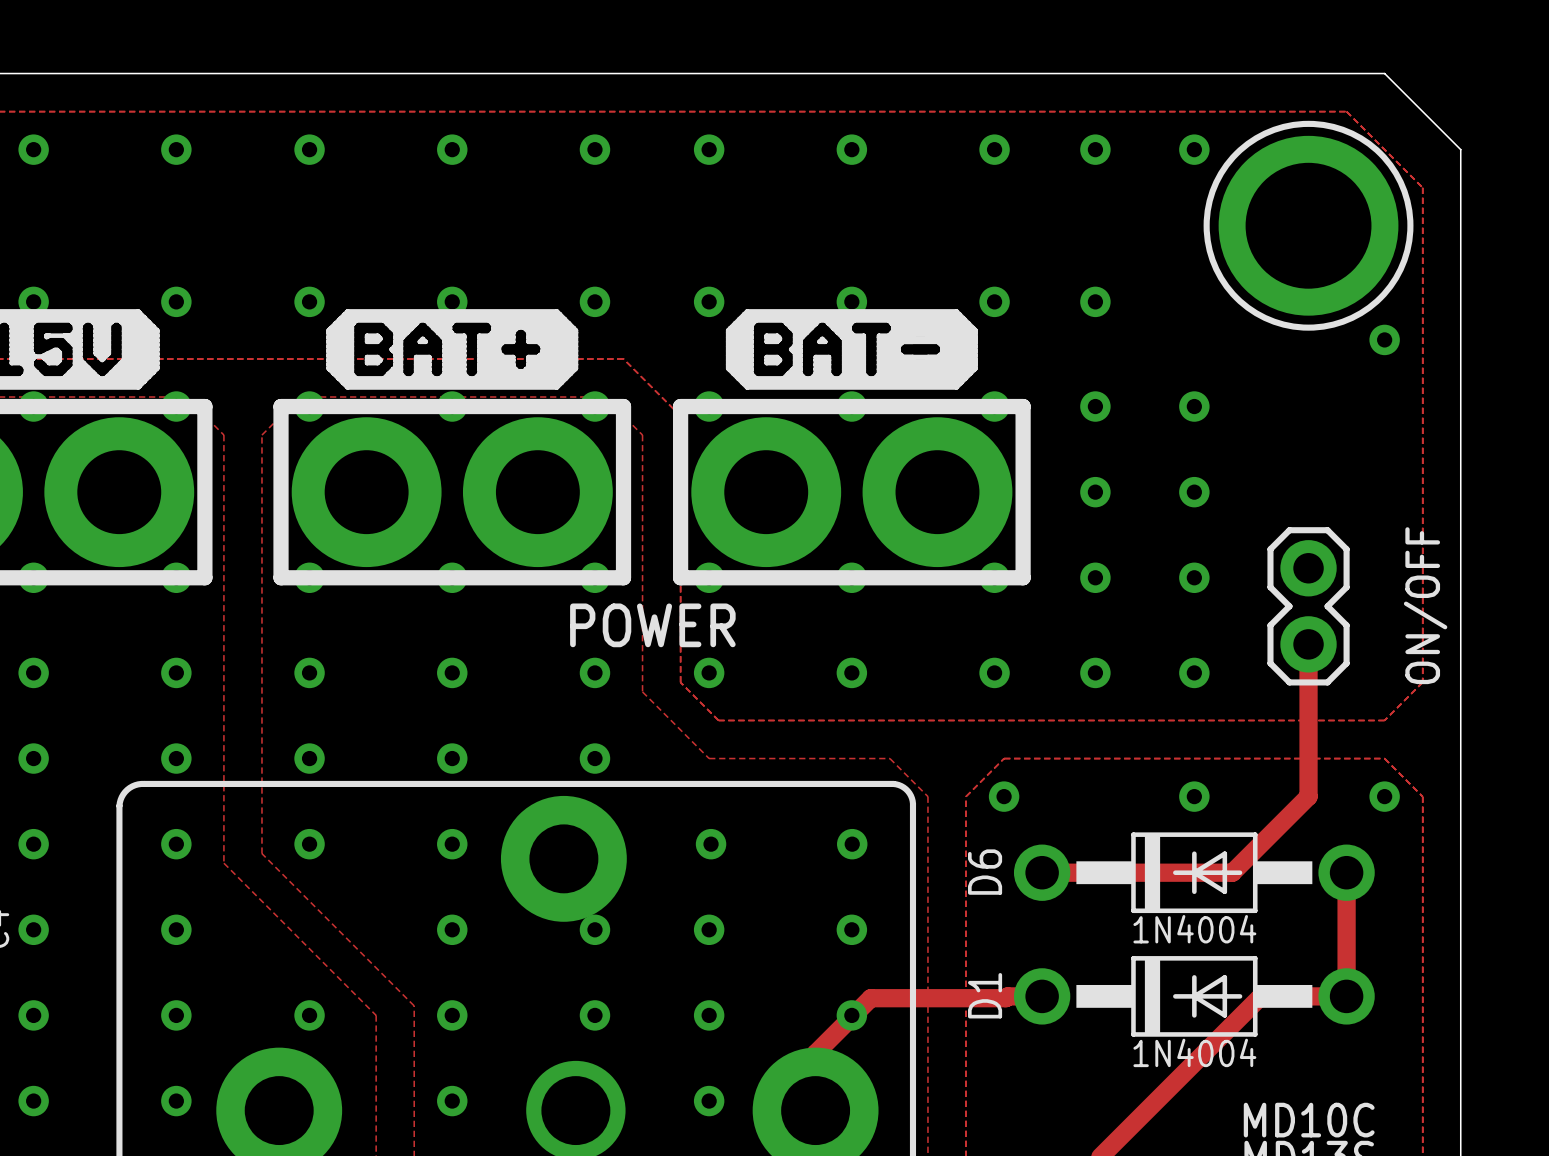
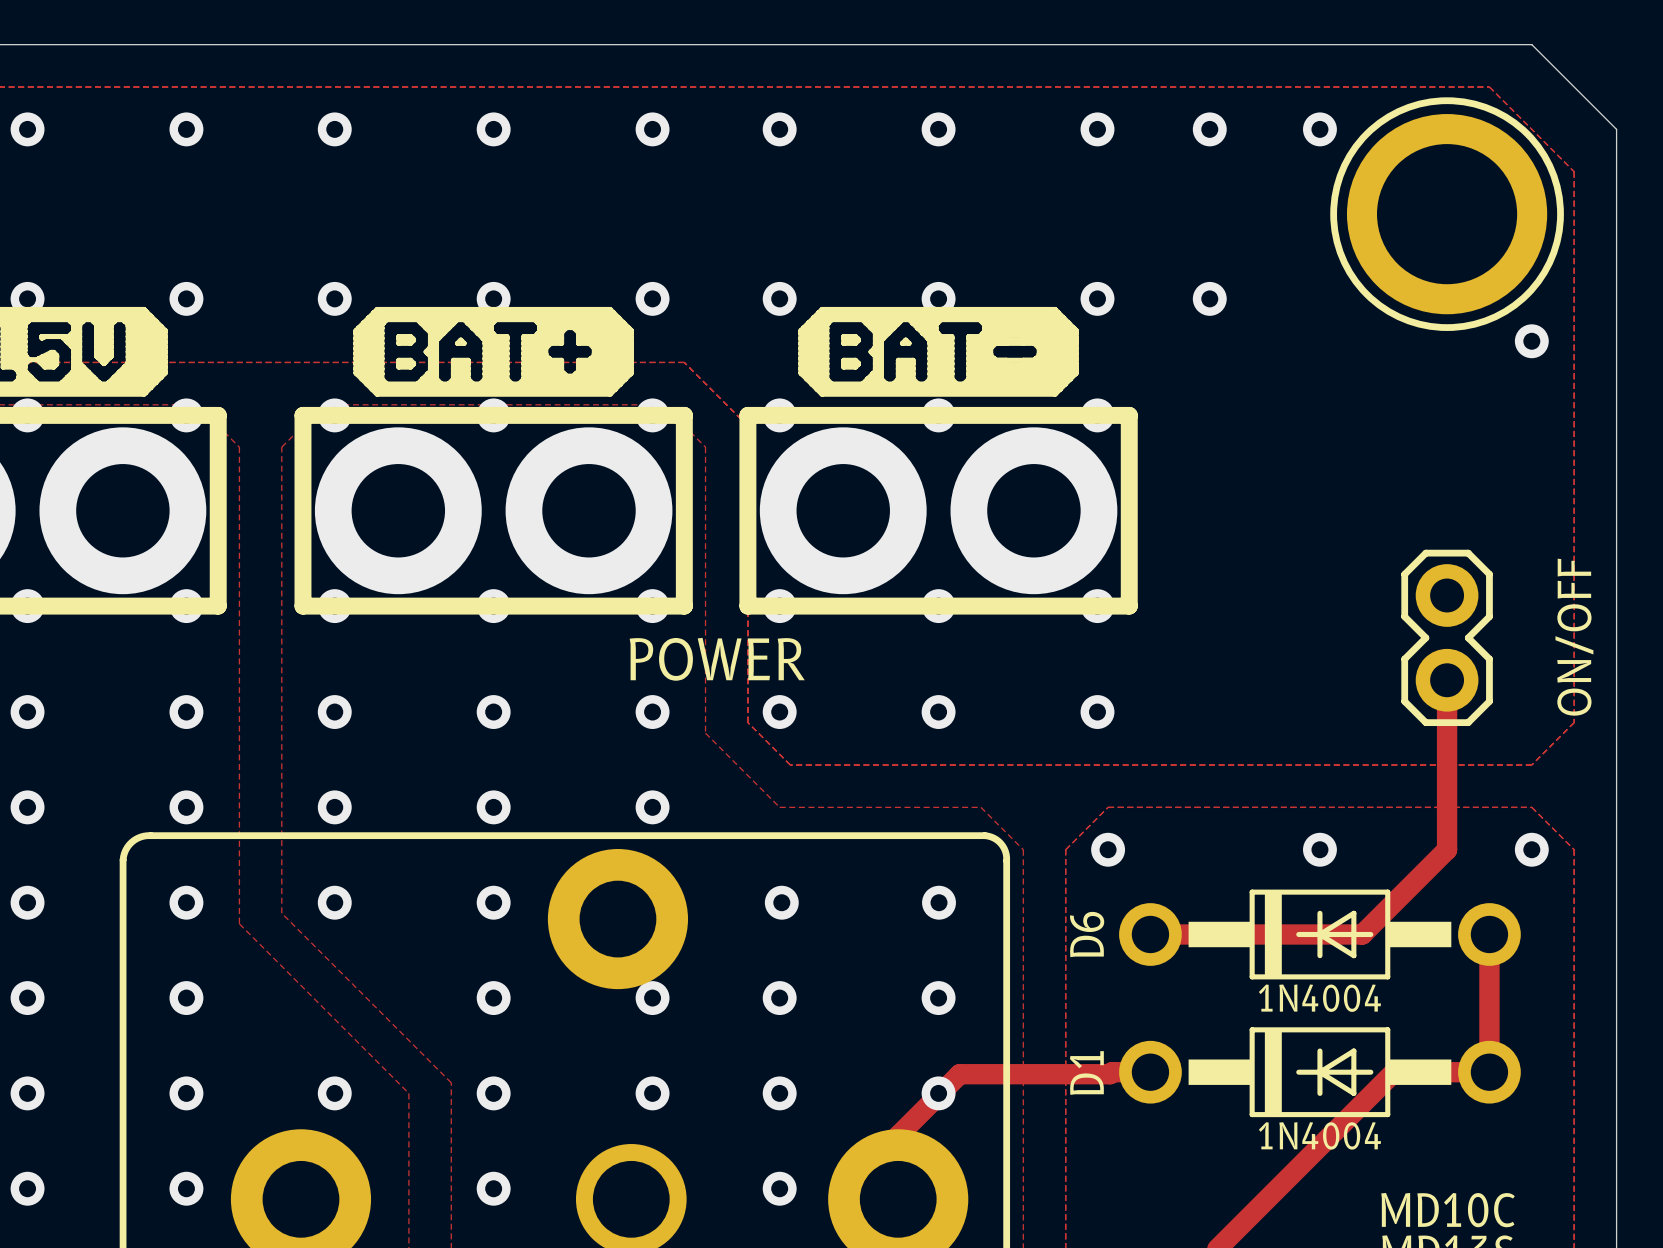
via: (1095, 406) -> none
via: (1194, 406) -> none
via: (1095, 492) -> none
via: (1194, 492) -> none
via: (1095, 577) -> none
via: (1194, 577) -> none
via: (1095, 672) -> none
via: (1194, 672) -> none

